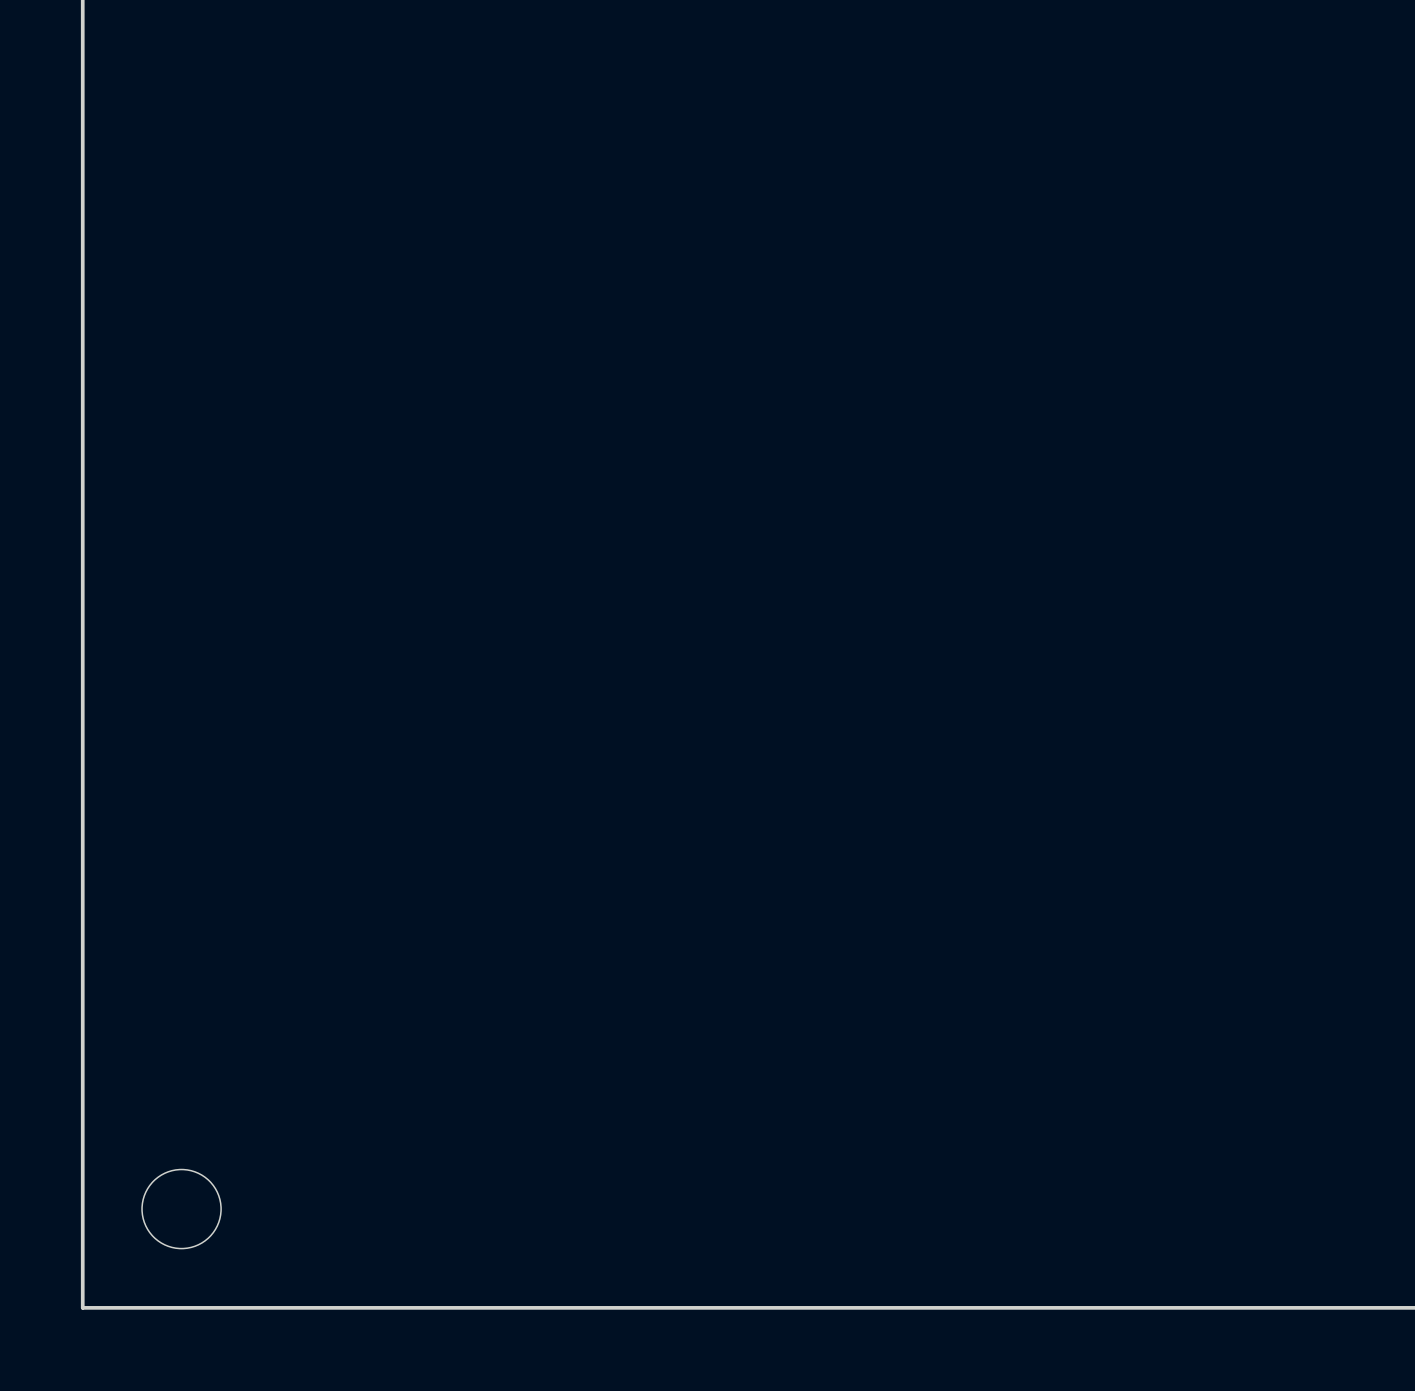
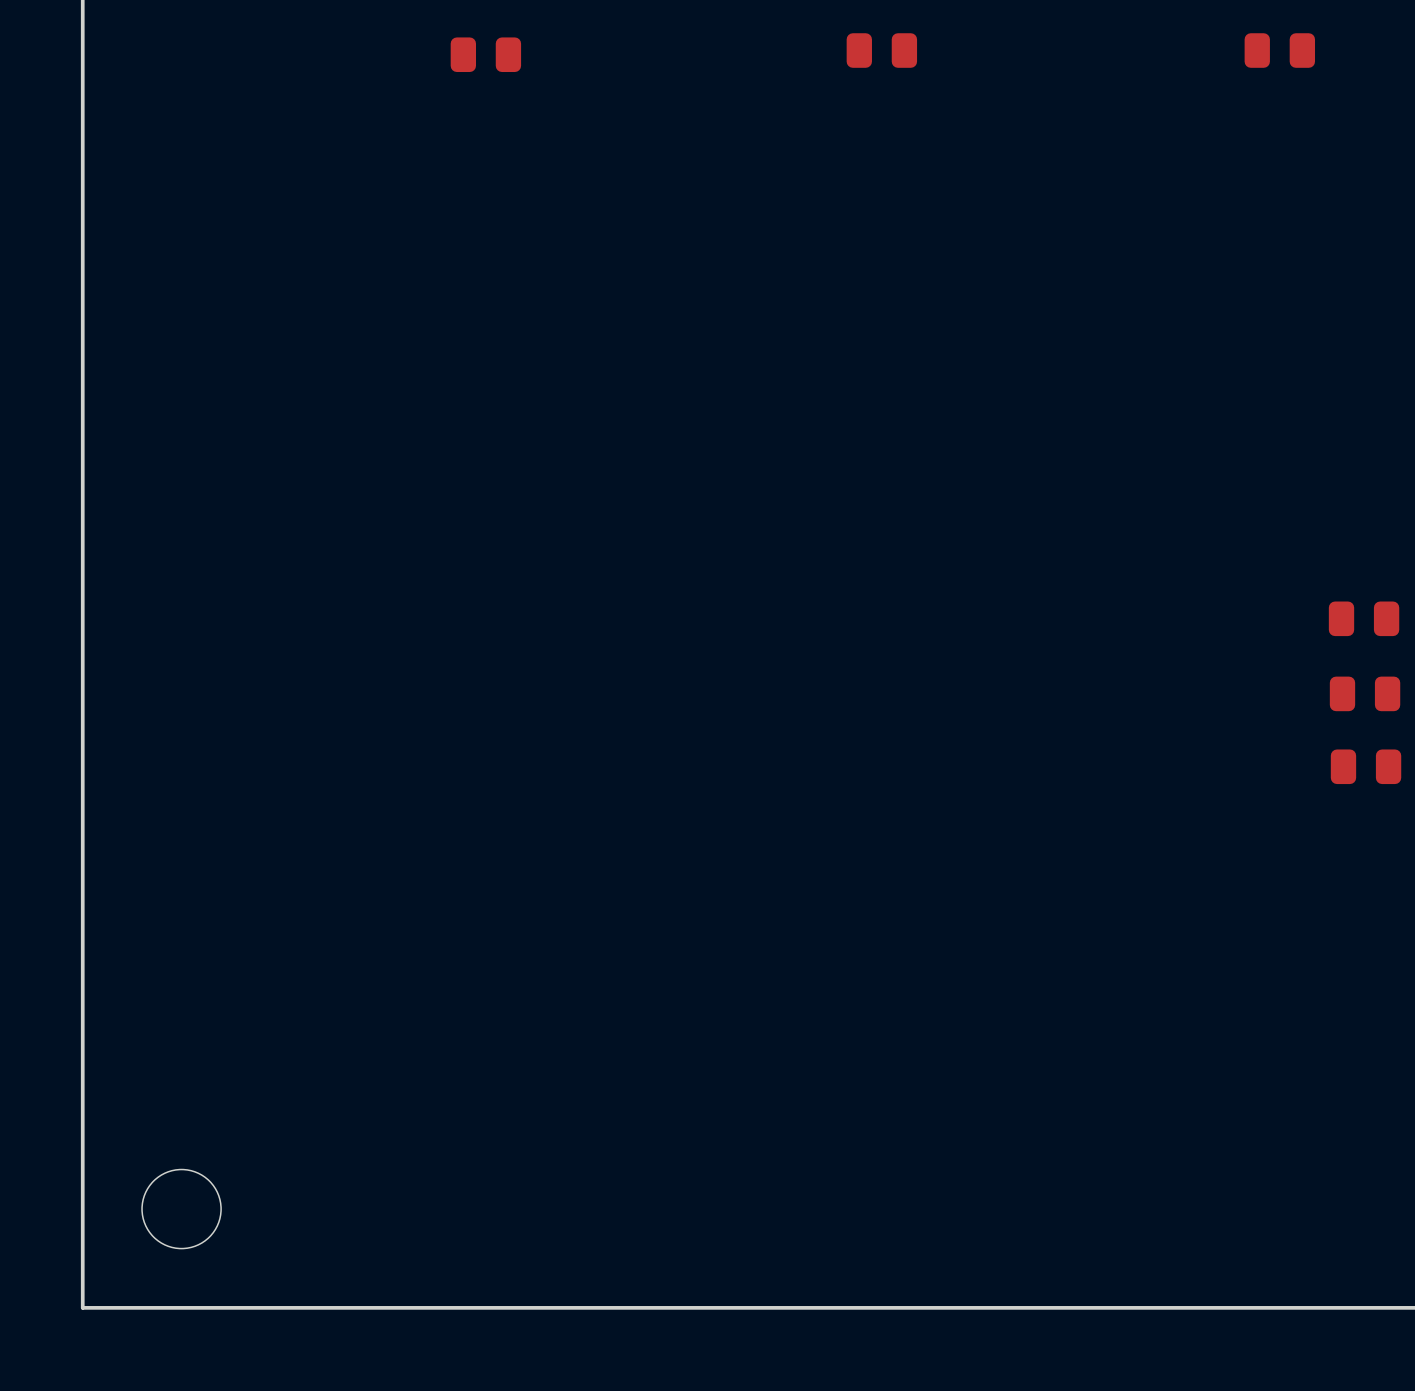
part: none -> (881, 50)
part: none -> (1279, 50)
part: none -> (485, 54)
part: none -> (1364, 618)
part: none -> (1365, 693)
part: none -> (1366, 766)

